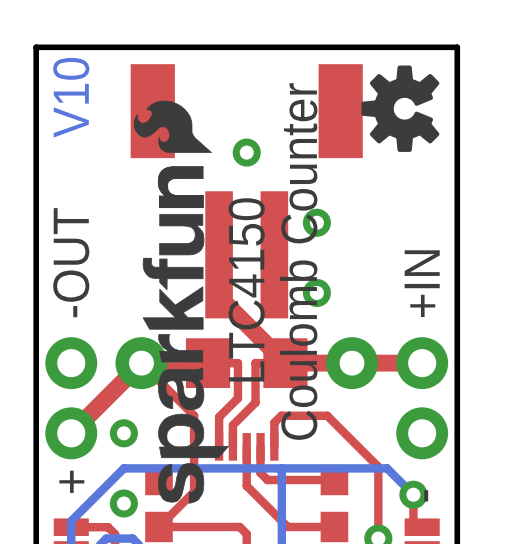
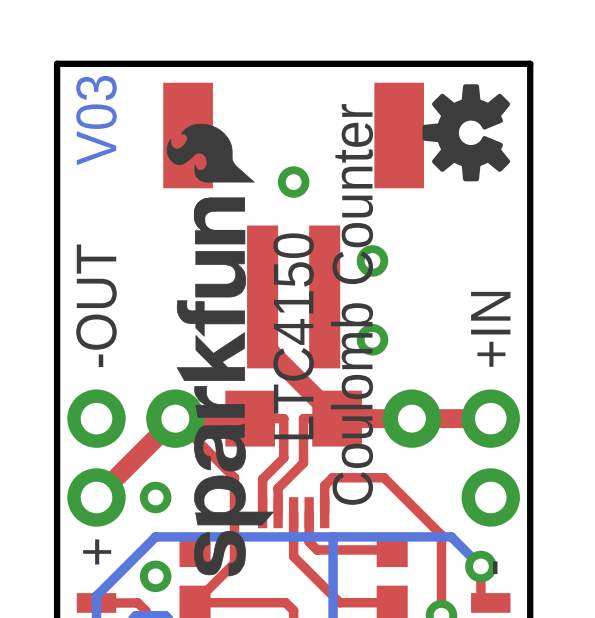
text: V10 (71, 97) -> V03 (96, 120)

